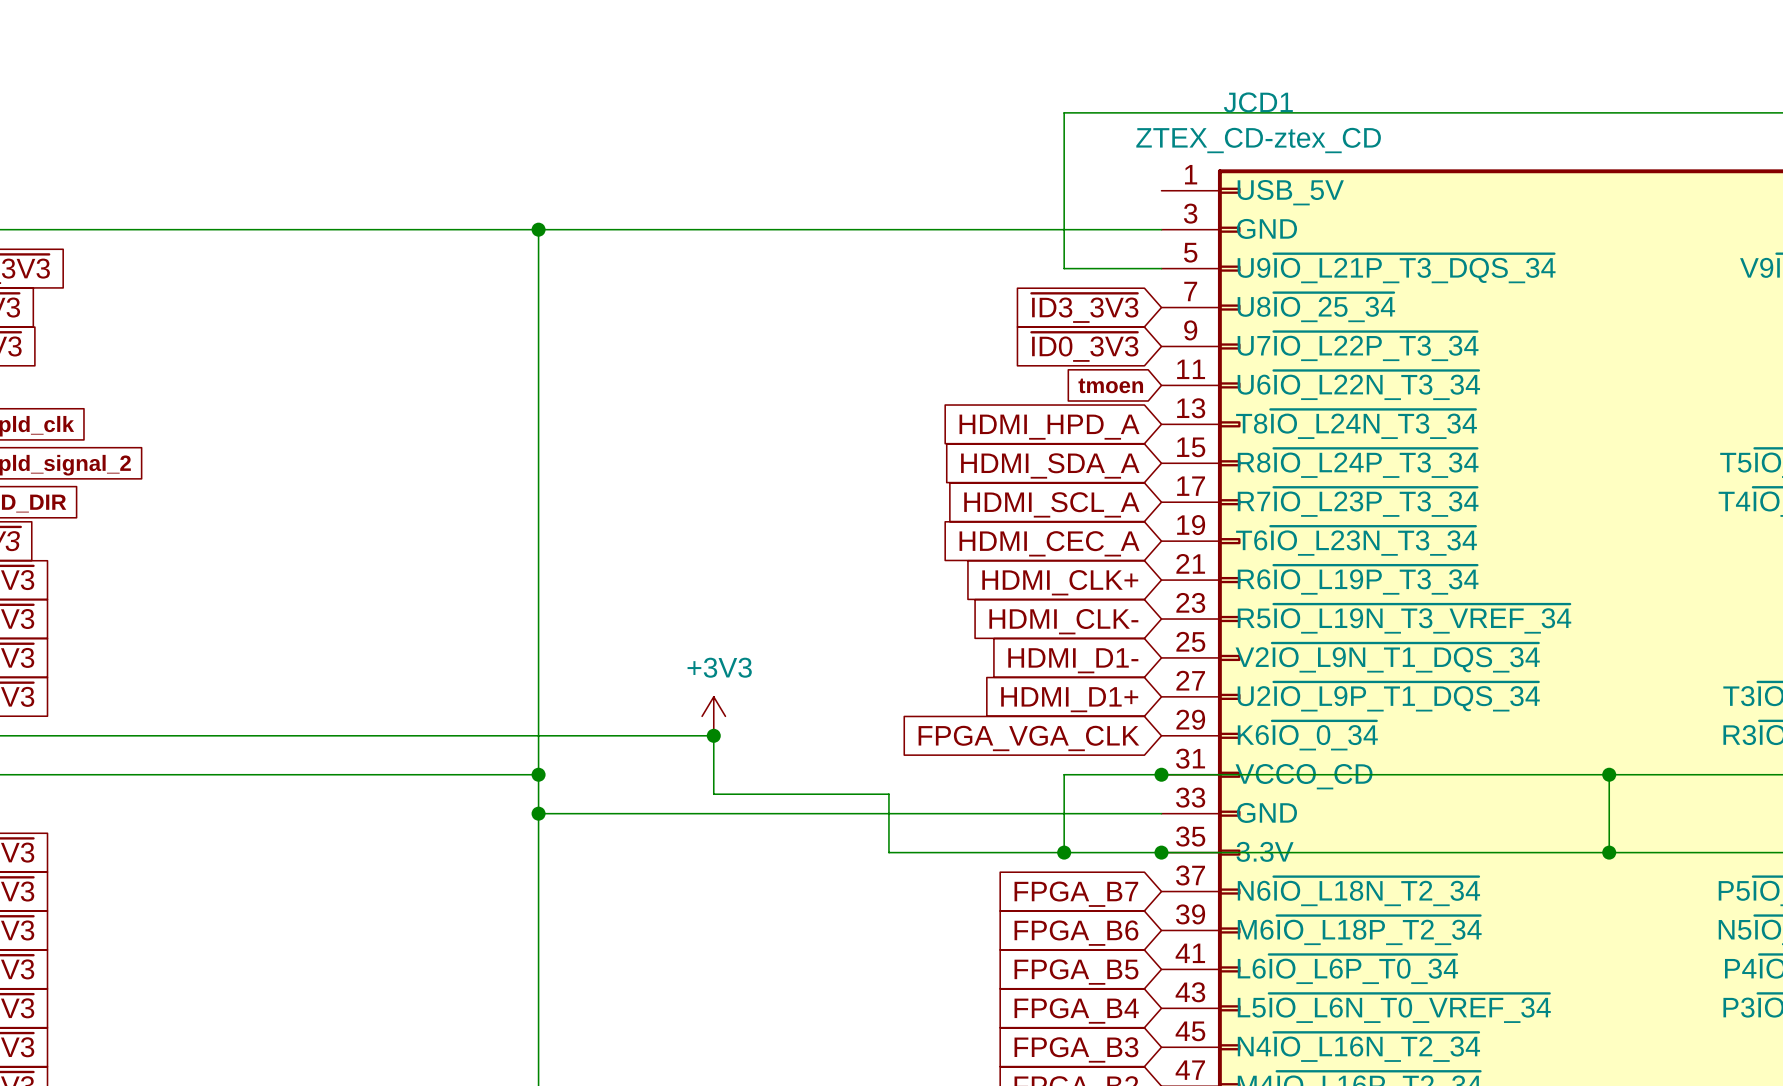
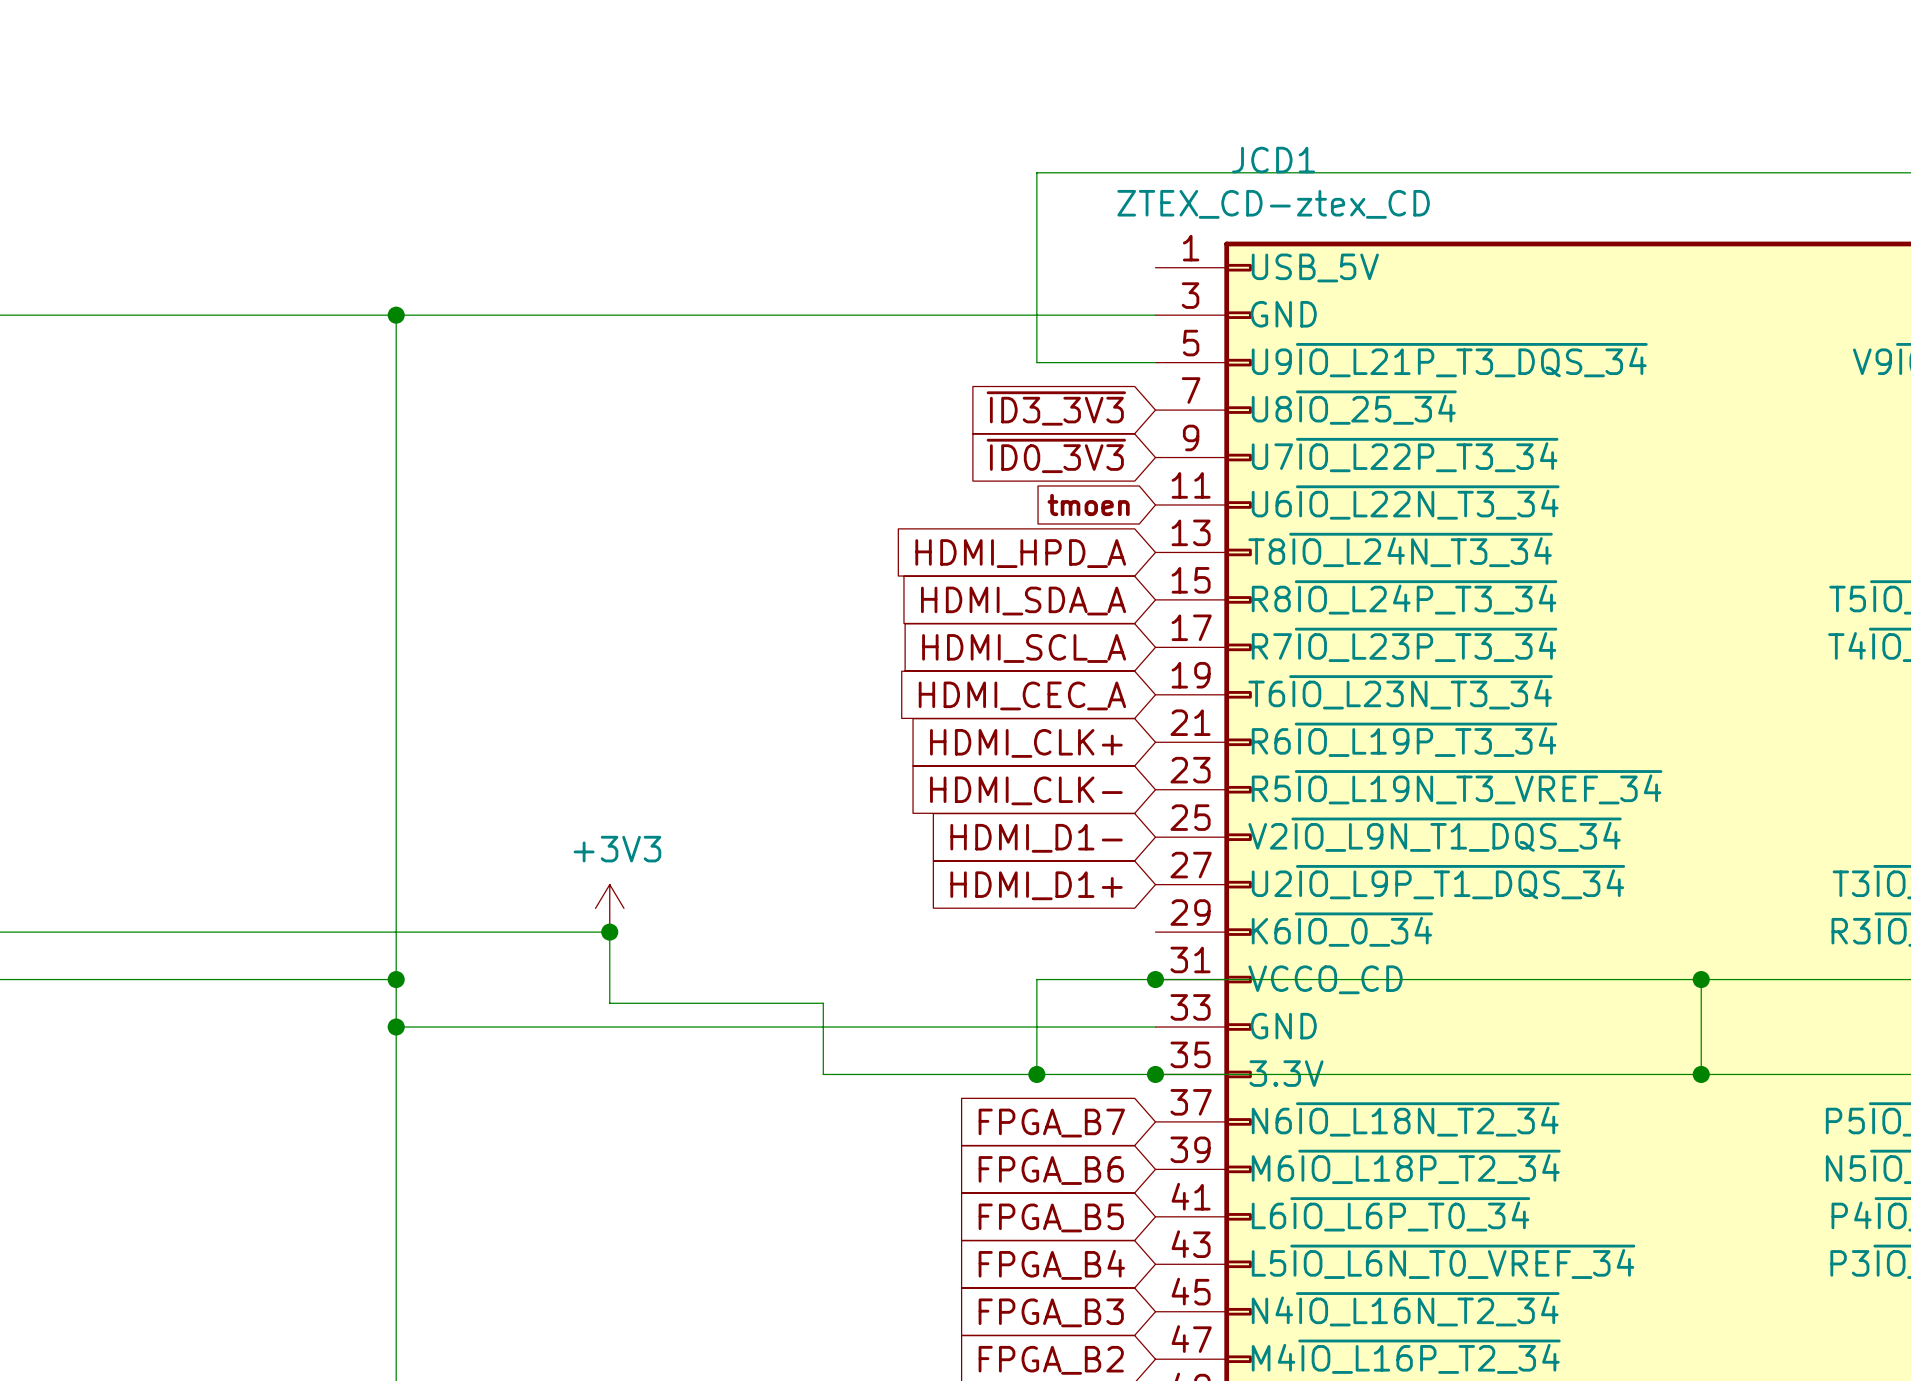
global label: FPGA_VGA_CLK (1028, 738) -> none

